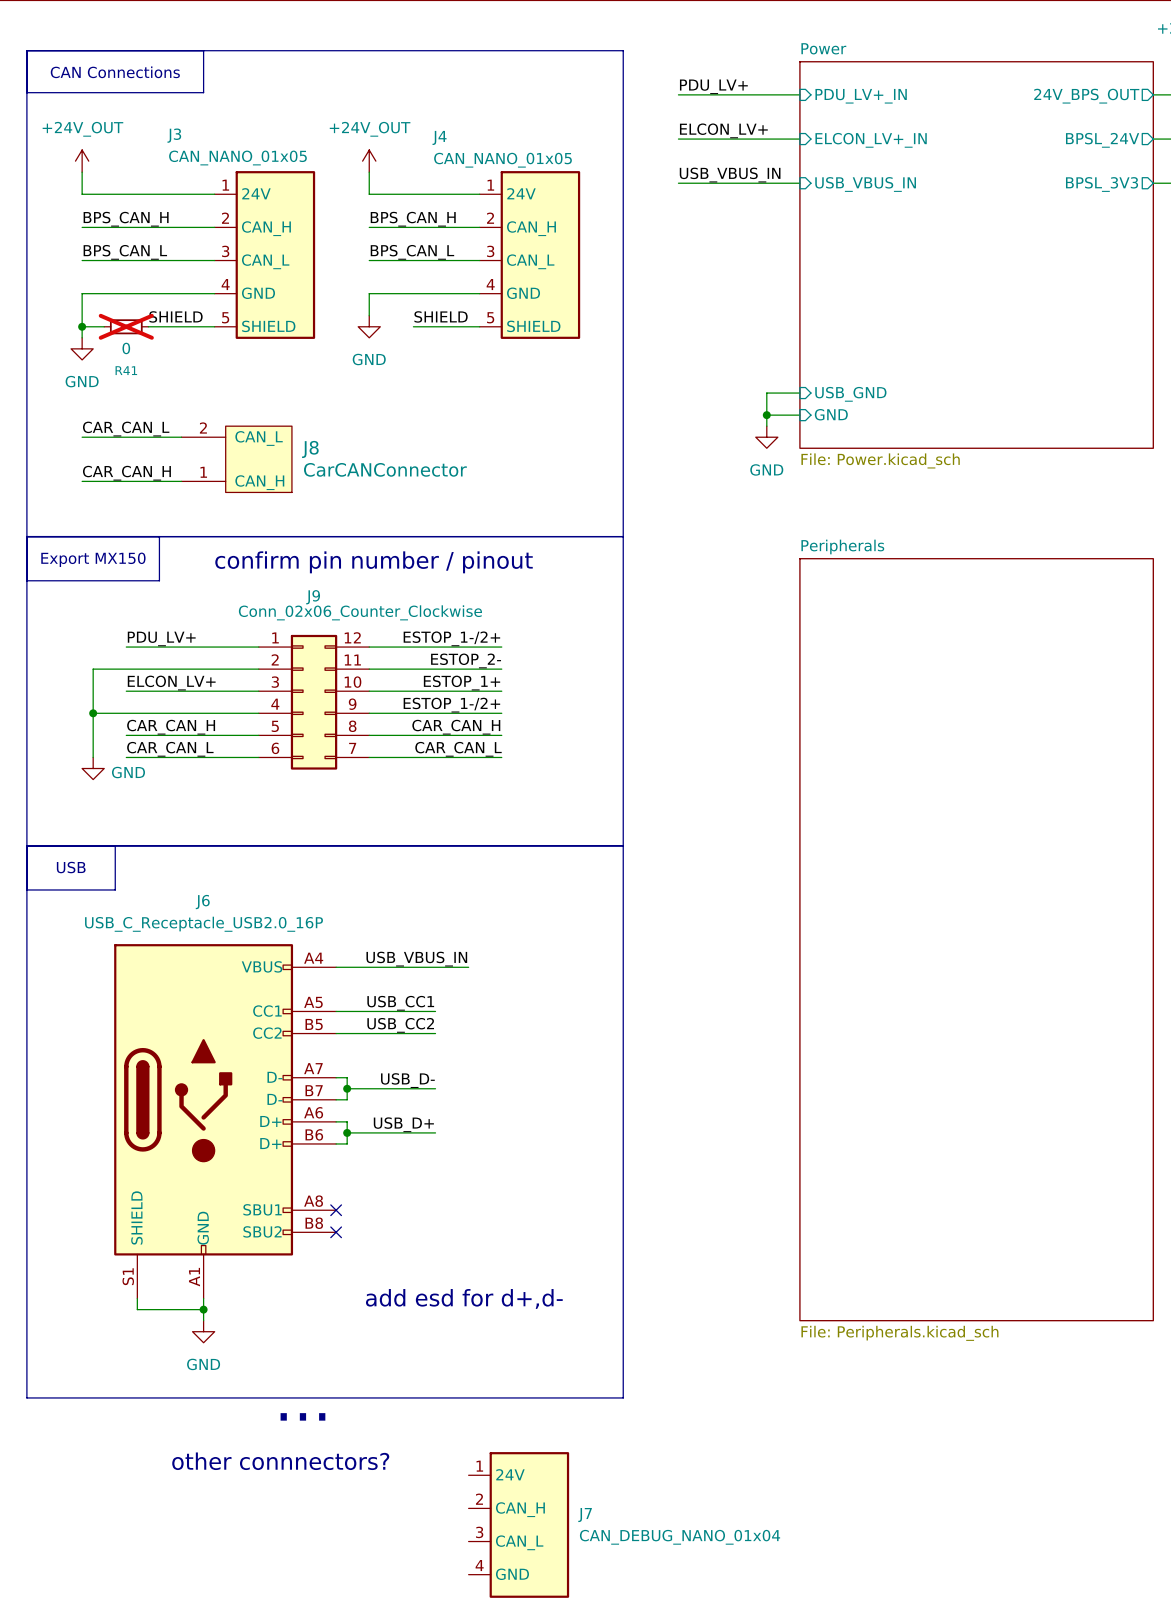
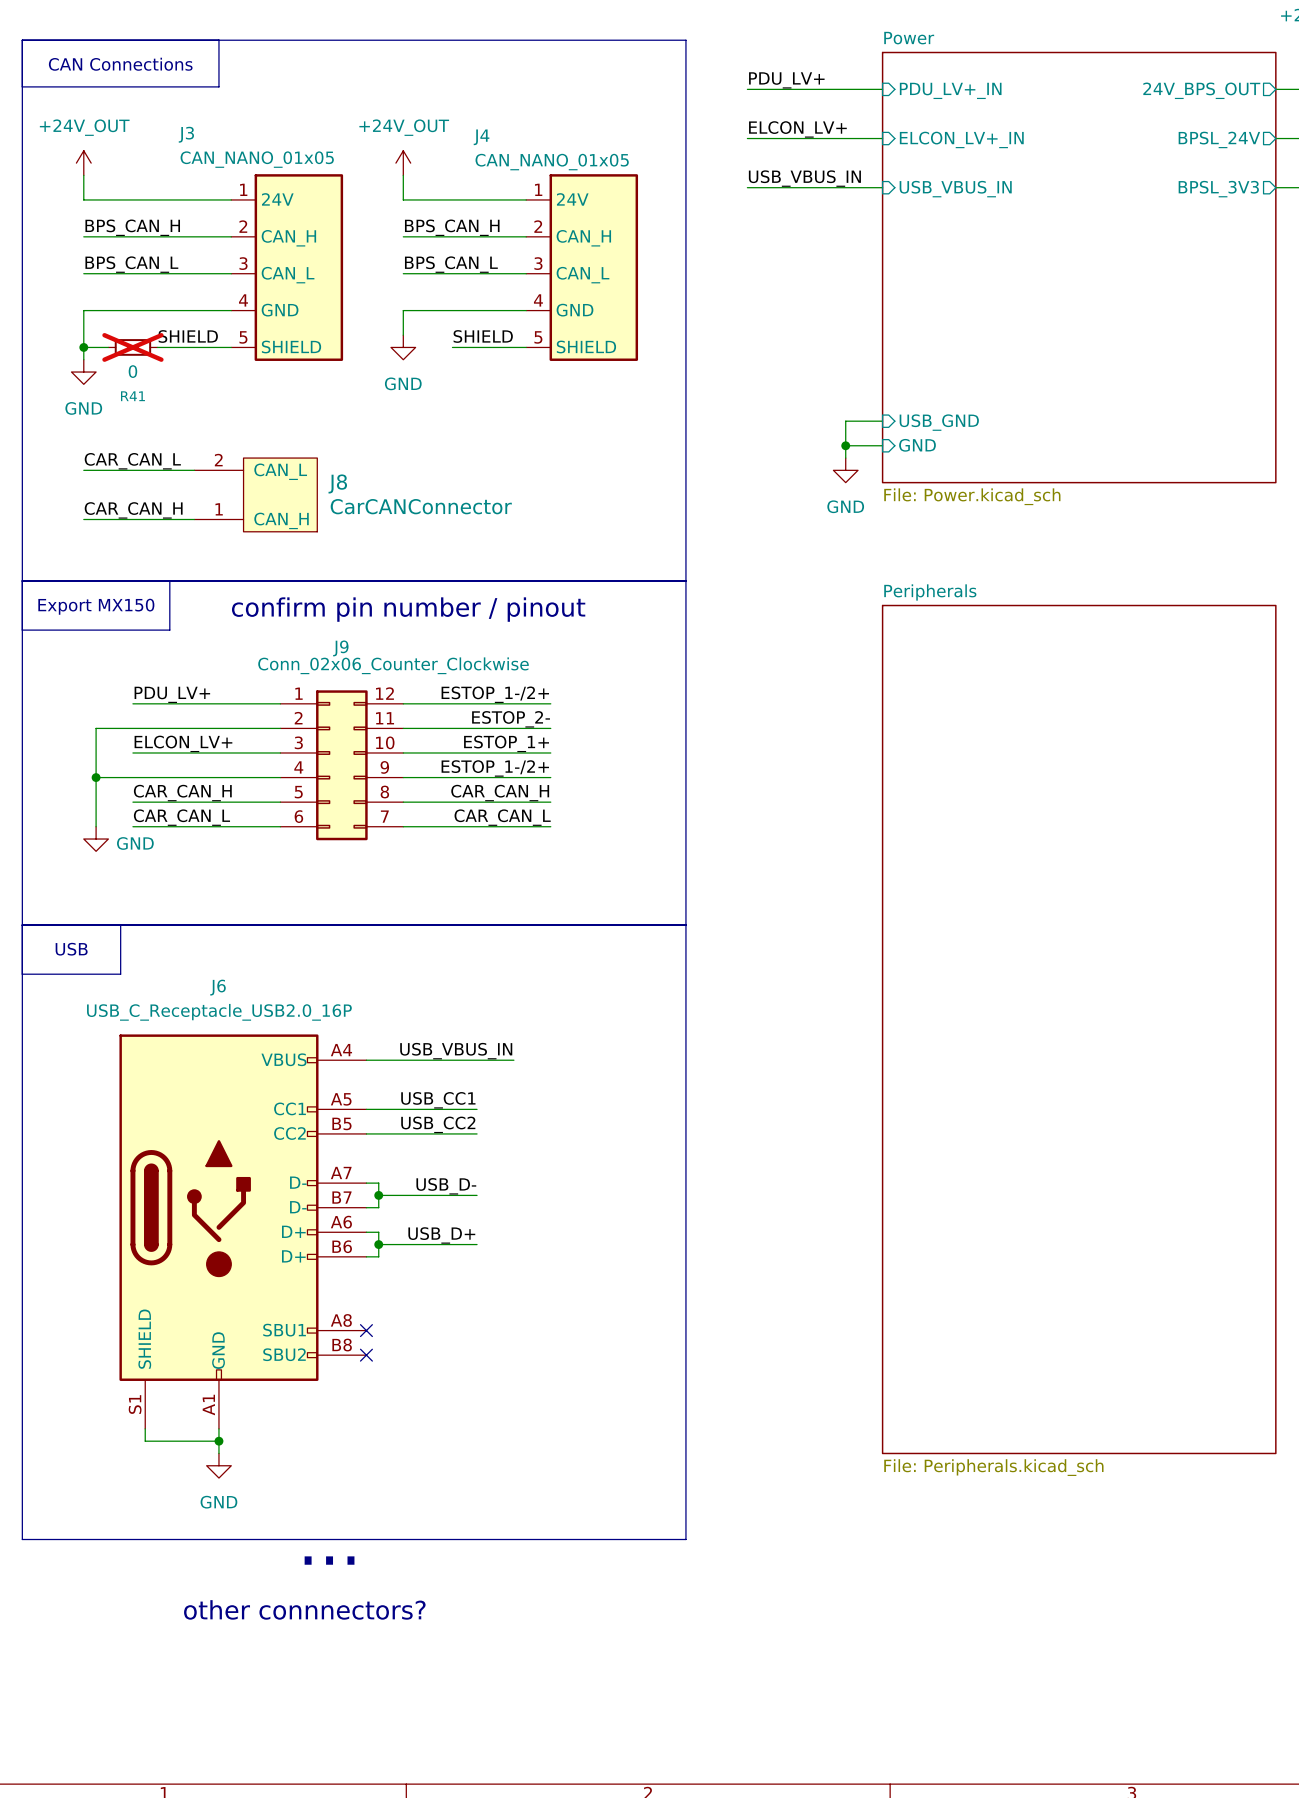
text: add esd for d+,d- (464, 1298) -> none
J7: CAN_DEBUG_NANO_01x04 (518, 1524) -> none

